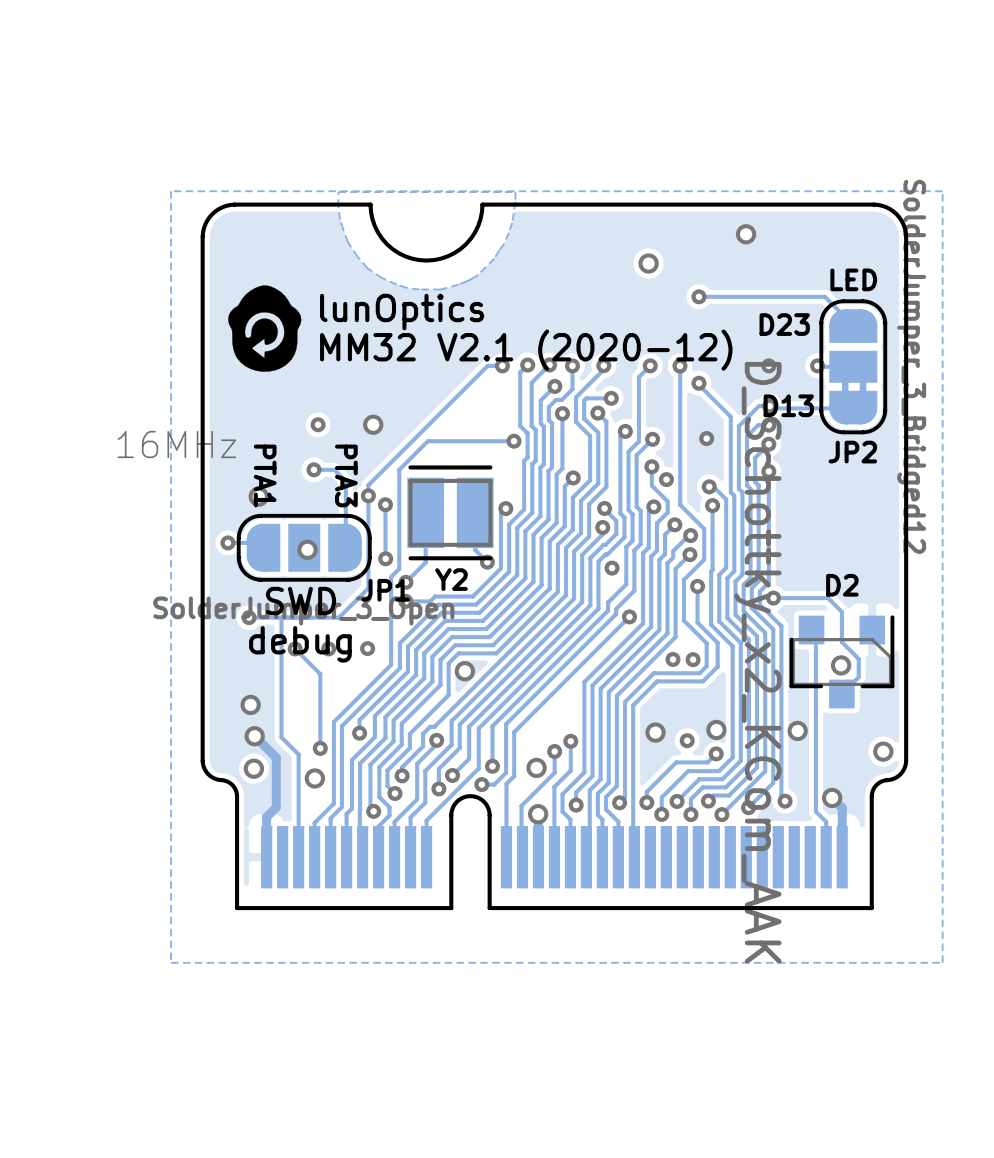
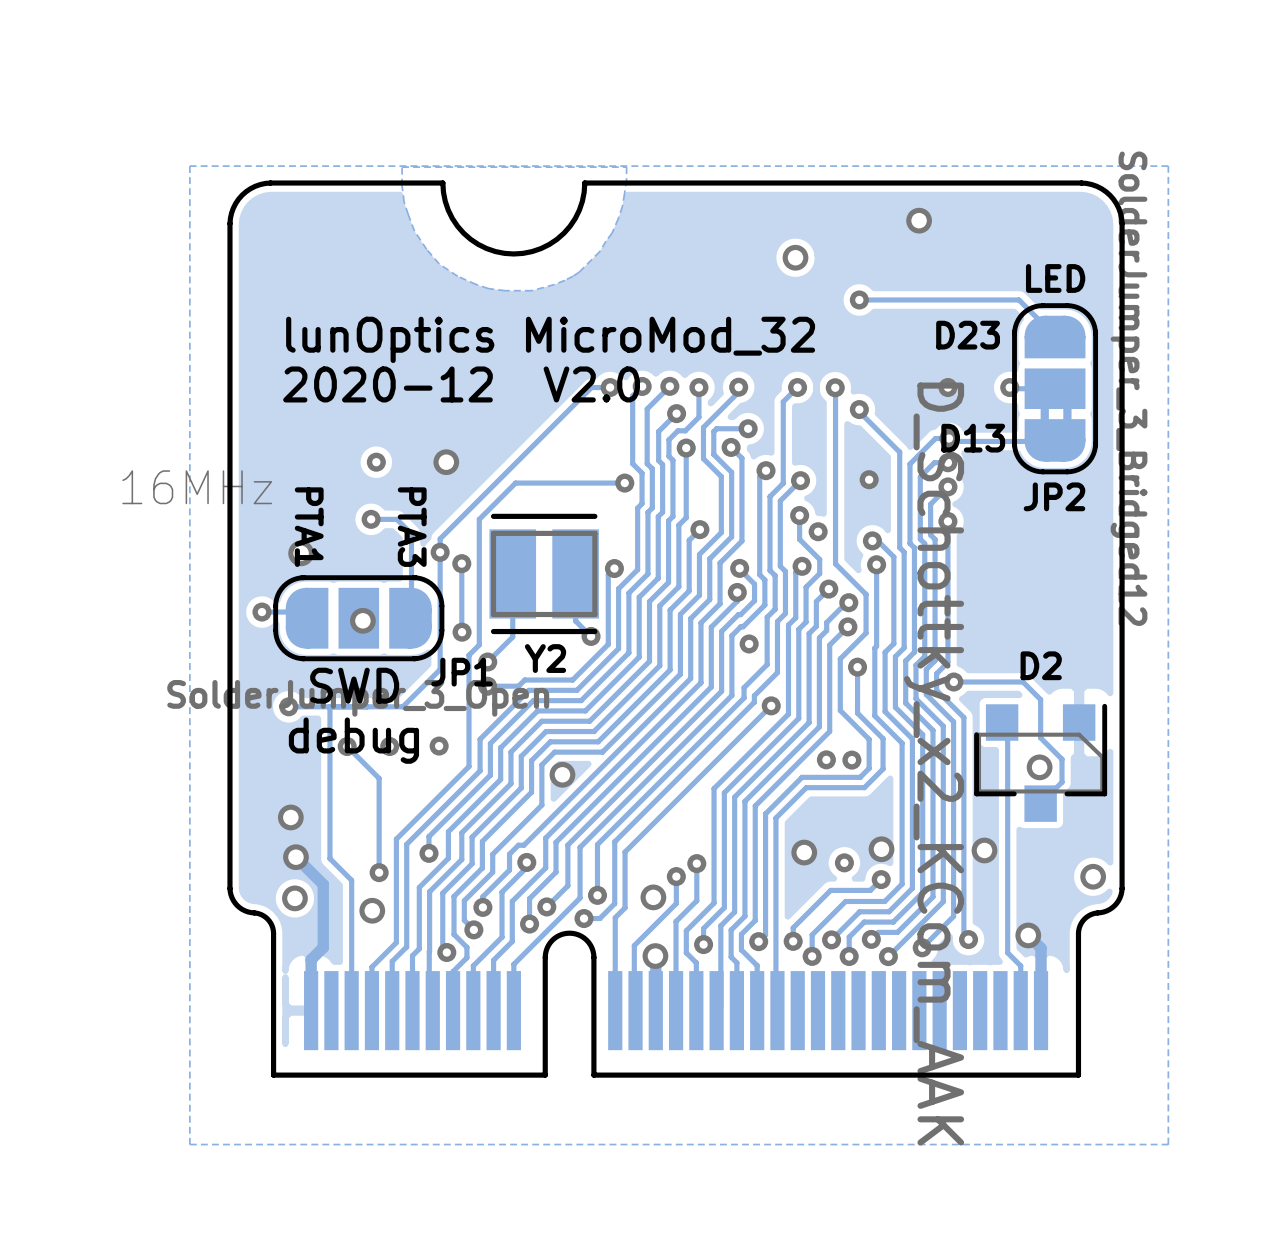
drawing: [228, 285, 302, 372] -> none
text: lunOptics (402, 312) -> none
text: none -> lunOptics MicroMod_32 (550, 339)
text: MM32 V2.1 (2020-12) (526, 350) -> none
text: none -> 2020-12 V2.0 (461, 384)

